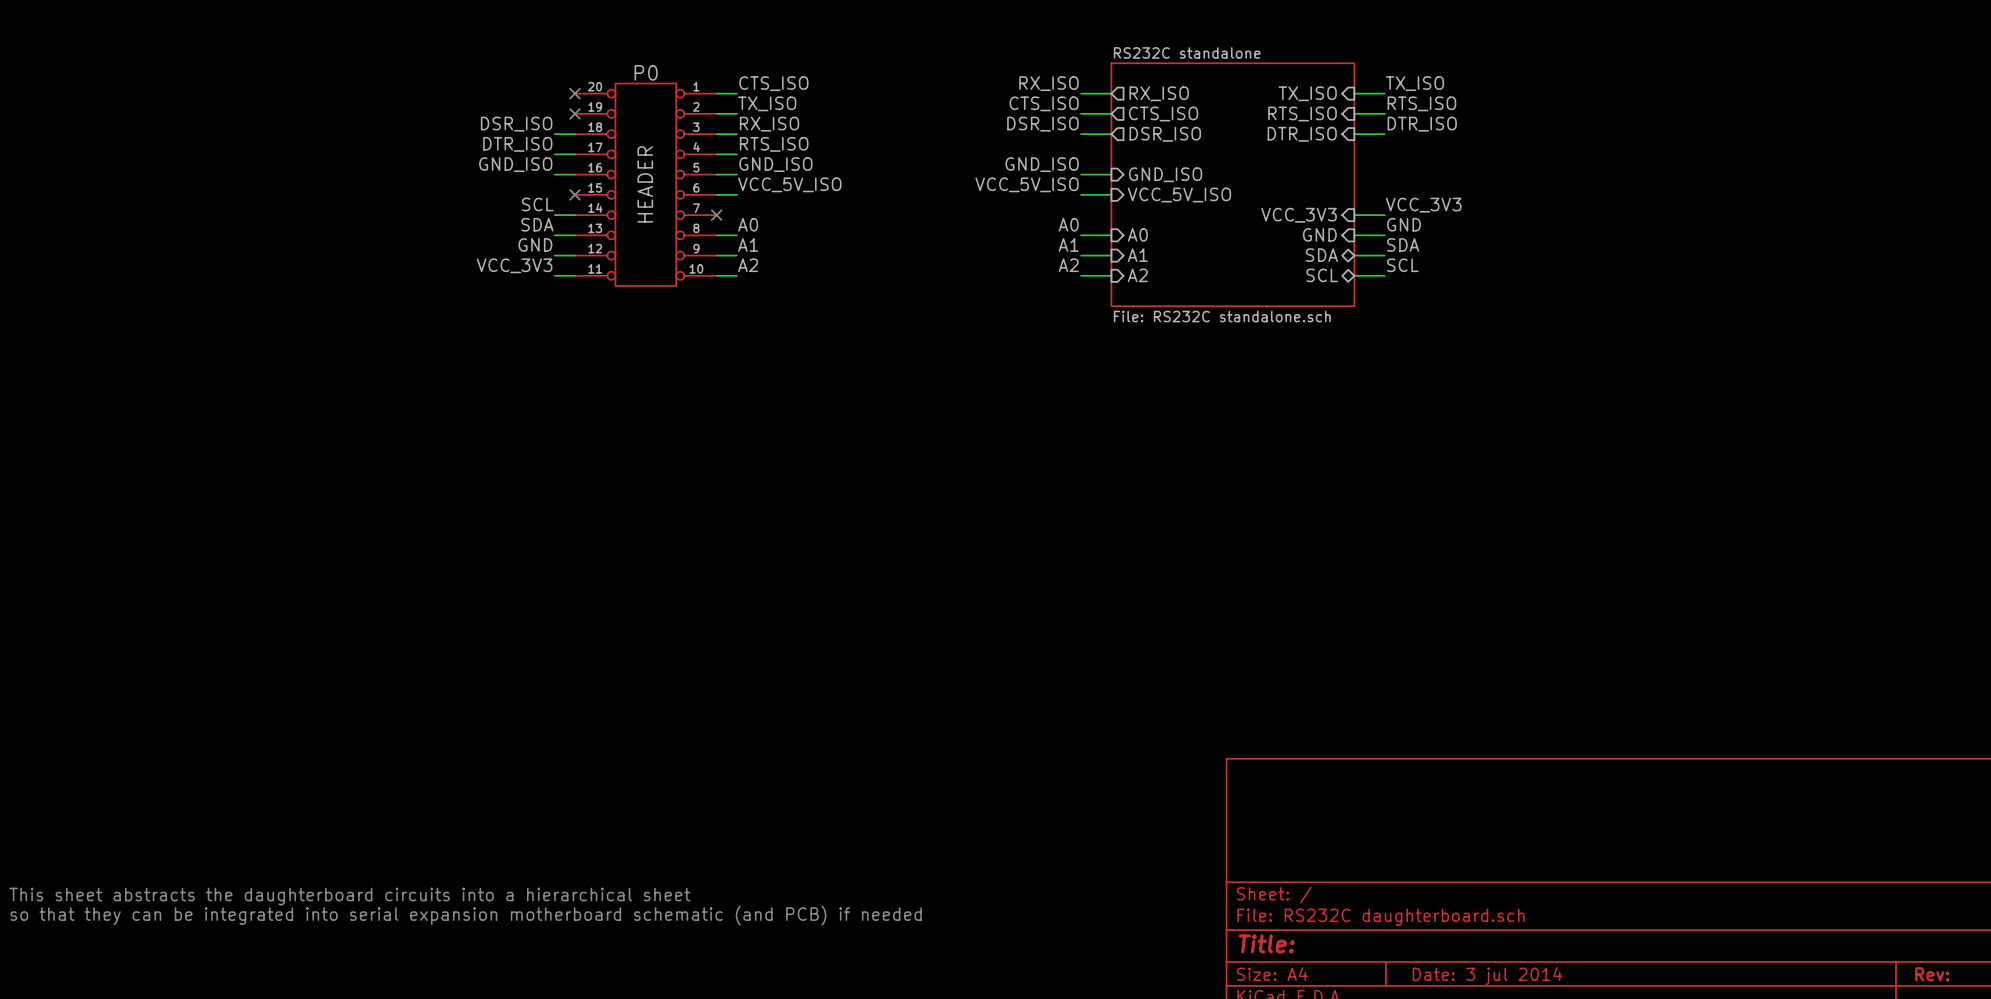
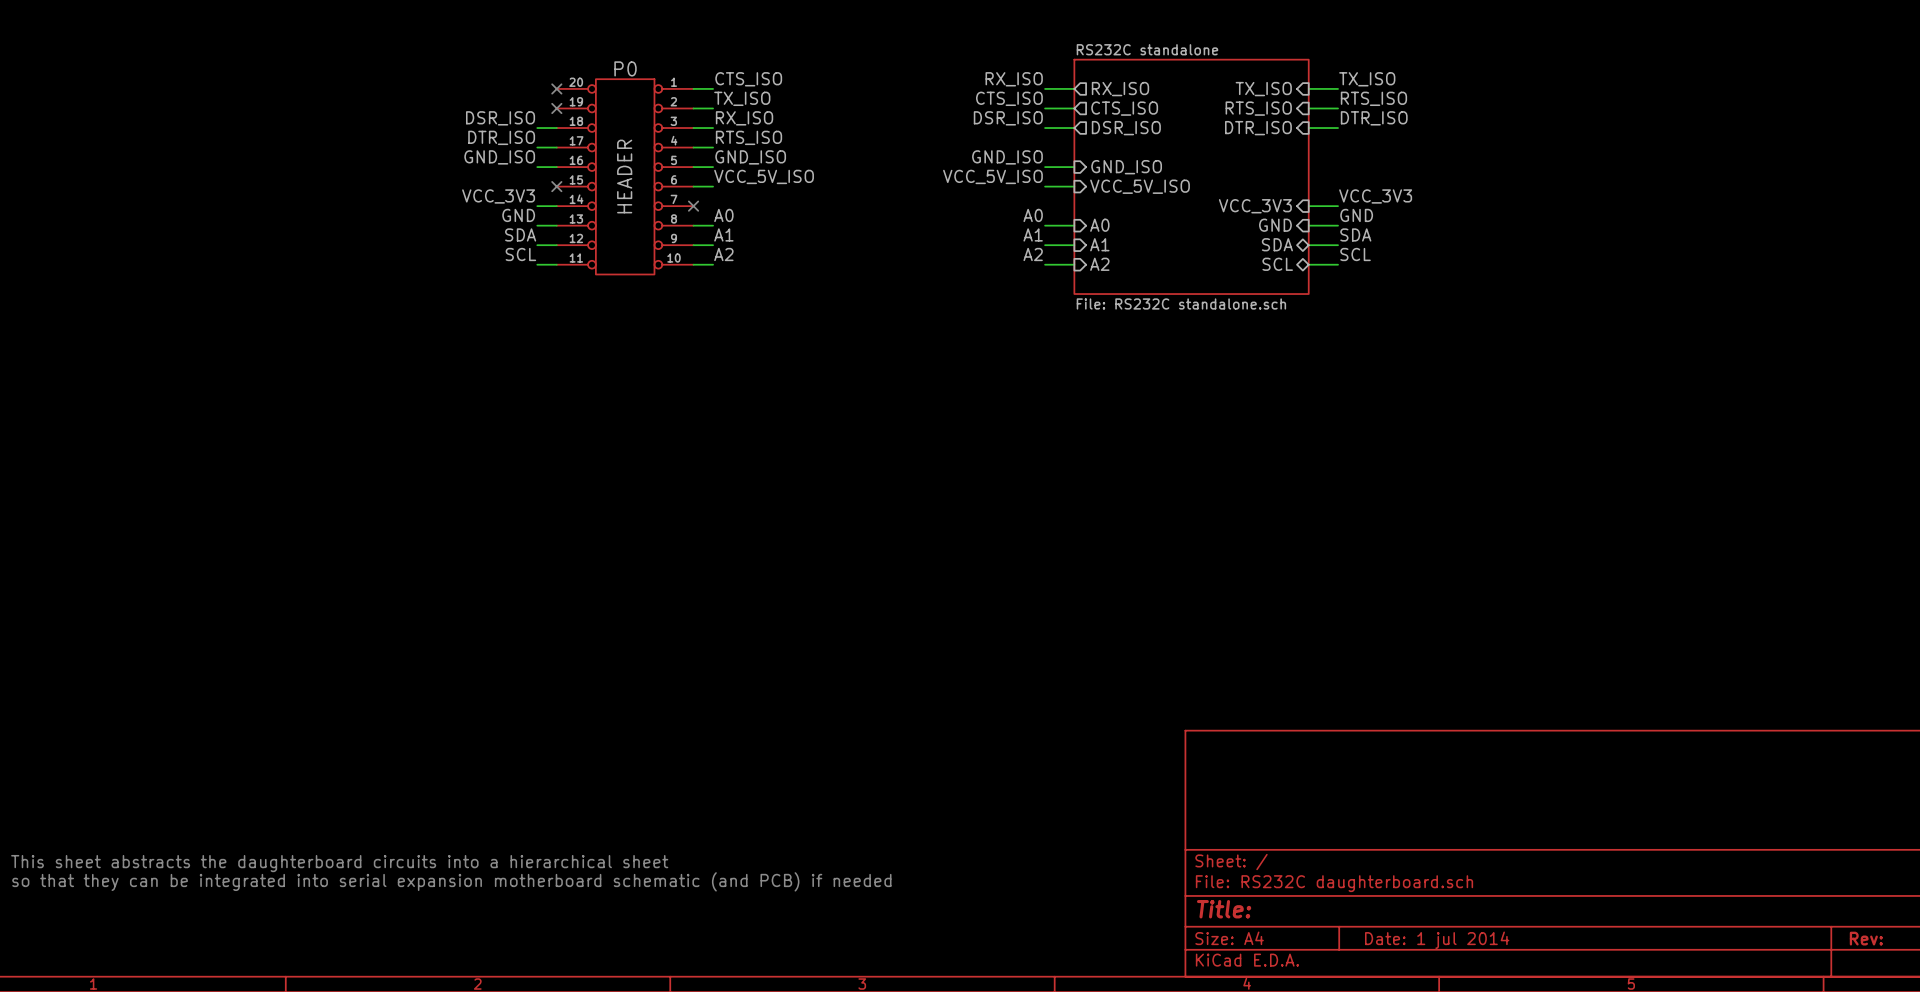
label: SCL (537, 204) -> VCC_3V3 (498, 196)
label: SDA (537, 224) -> GND (518, 215)
label: GND (535, 244) -> SDA (520, 234)
label: VCC_3V3 (514, 265) -> SCL (520, 254)
title block: Date: 3 jul 2014 (1487, 976) -> Date: 1 jul 2014 (1437, 940)

